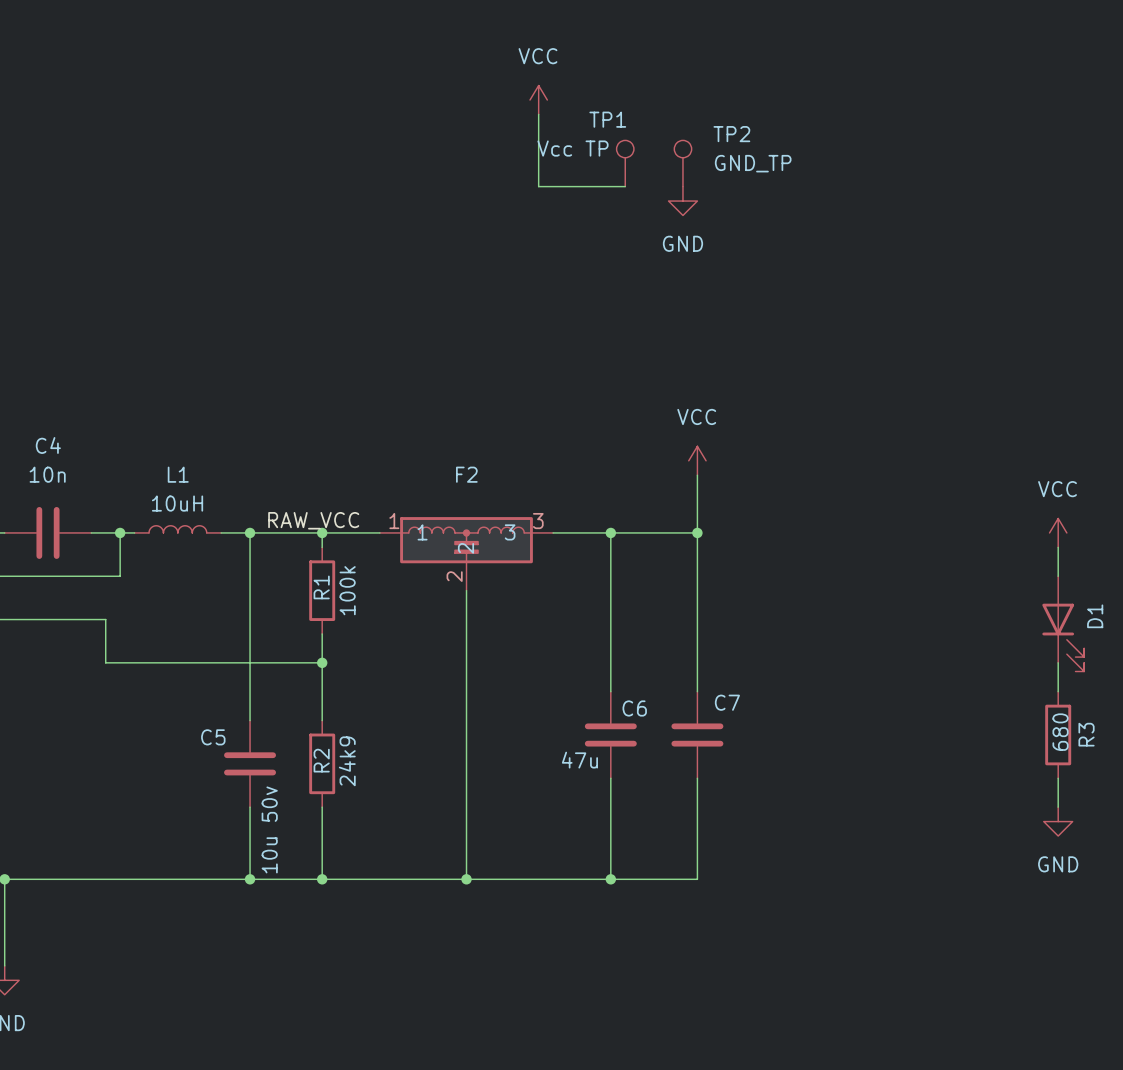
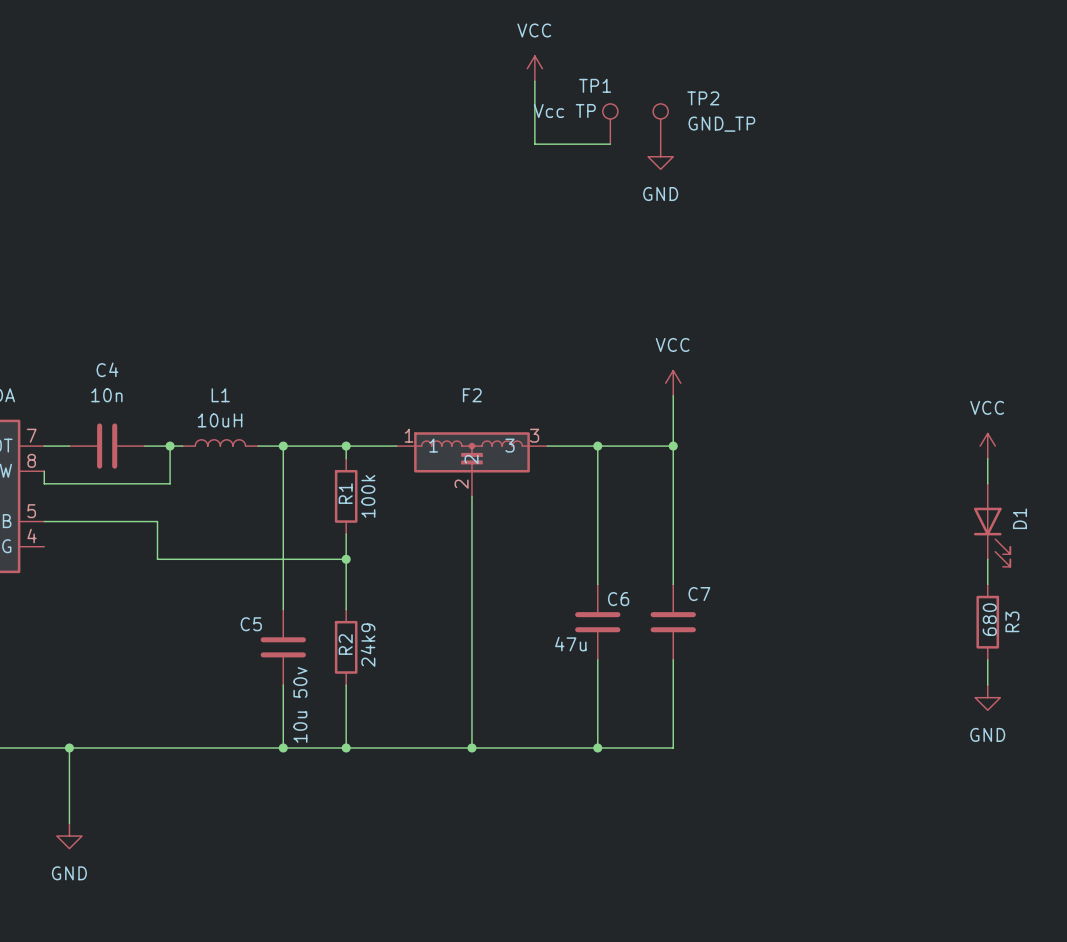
label: RAW_VCC (313, 520) -> none

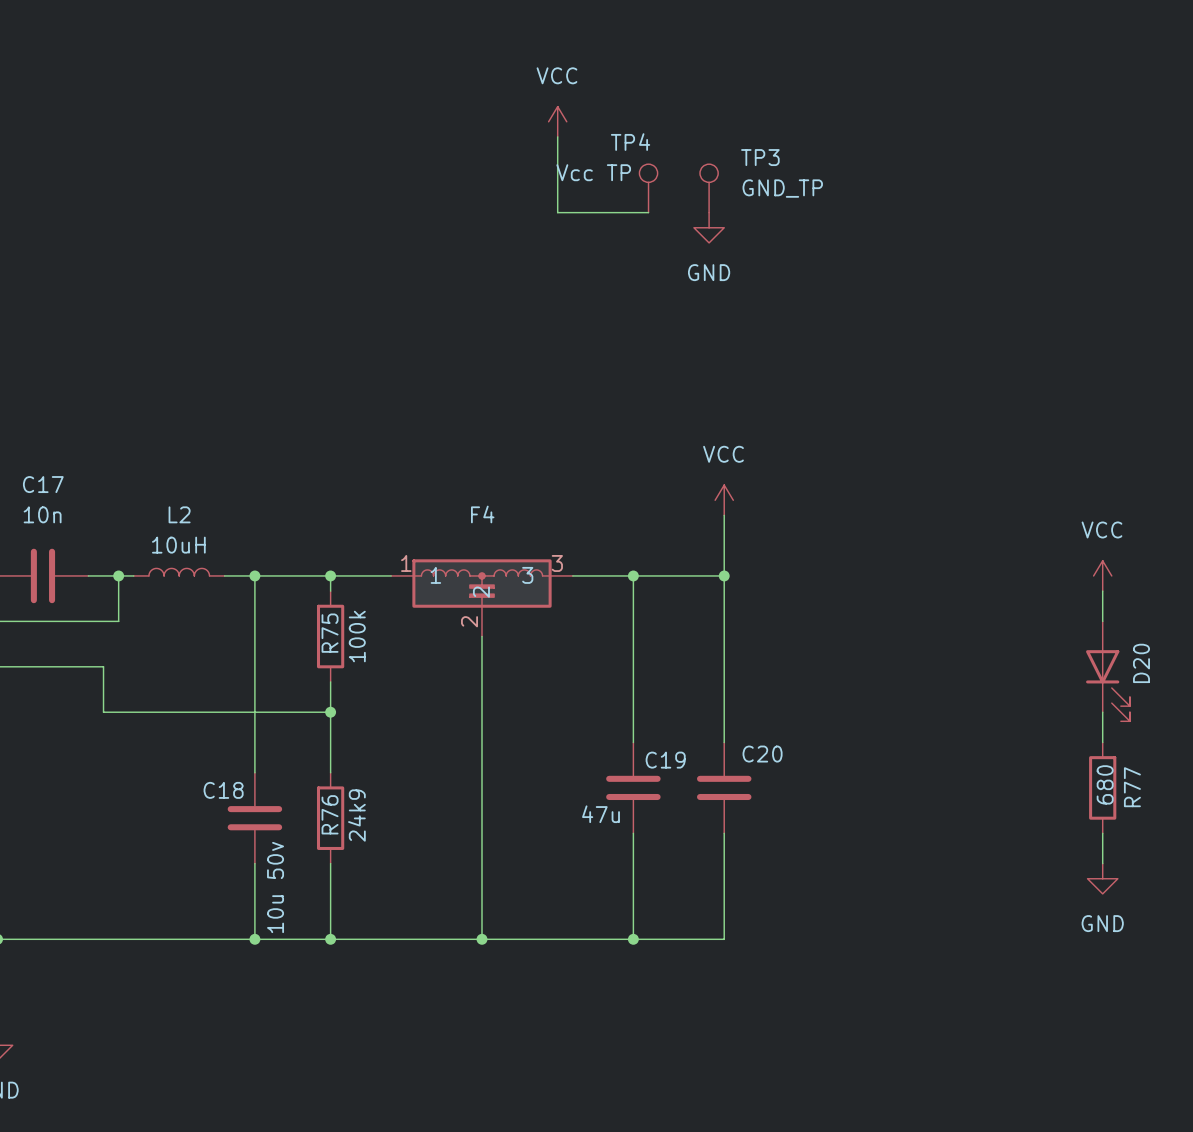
TP1 name: TP1 (595, 85) -> TP4 (630, 142)
TP2 name: TP2 (703, 98) -> TP3 (760, 157)
C4 name: C4 (107, 369) -> C17 (43, 484)
L1 name: L1 (220, 395) -> L2 (179, 514)
F2 name: F2 (472, 395) -> F4 (482, 514)
R1 name: R1 (345, 493) -> R75 (330, 633)
D1 name: D1 (1019, 518) -> D20 (1141, 663)
C7 name: C7 (699, 594) -> C20 (762, 754)
C6 name: C6 (618, 599) -> C19 (665, 760)
R3 name: R3 (1012, 621) -> R77 (1132, 787)
C5 name: C5 (251, 624) -> C18 (223, 790)
R2 name: R2 (345, 644) -> R76 (330, 814)

